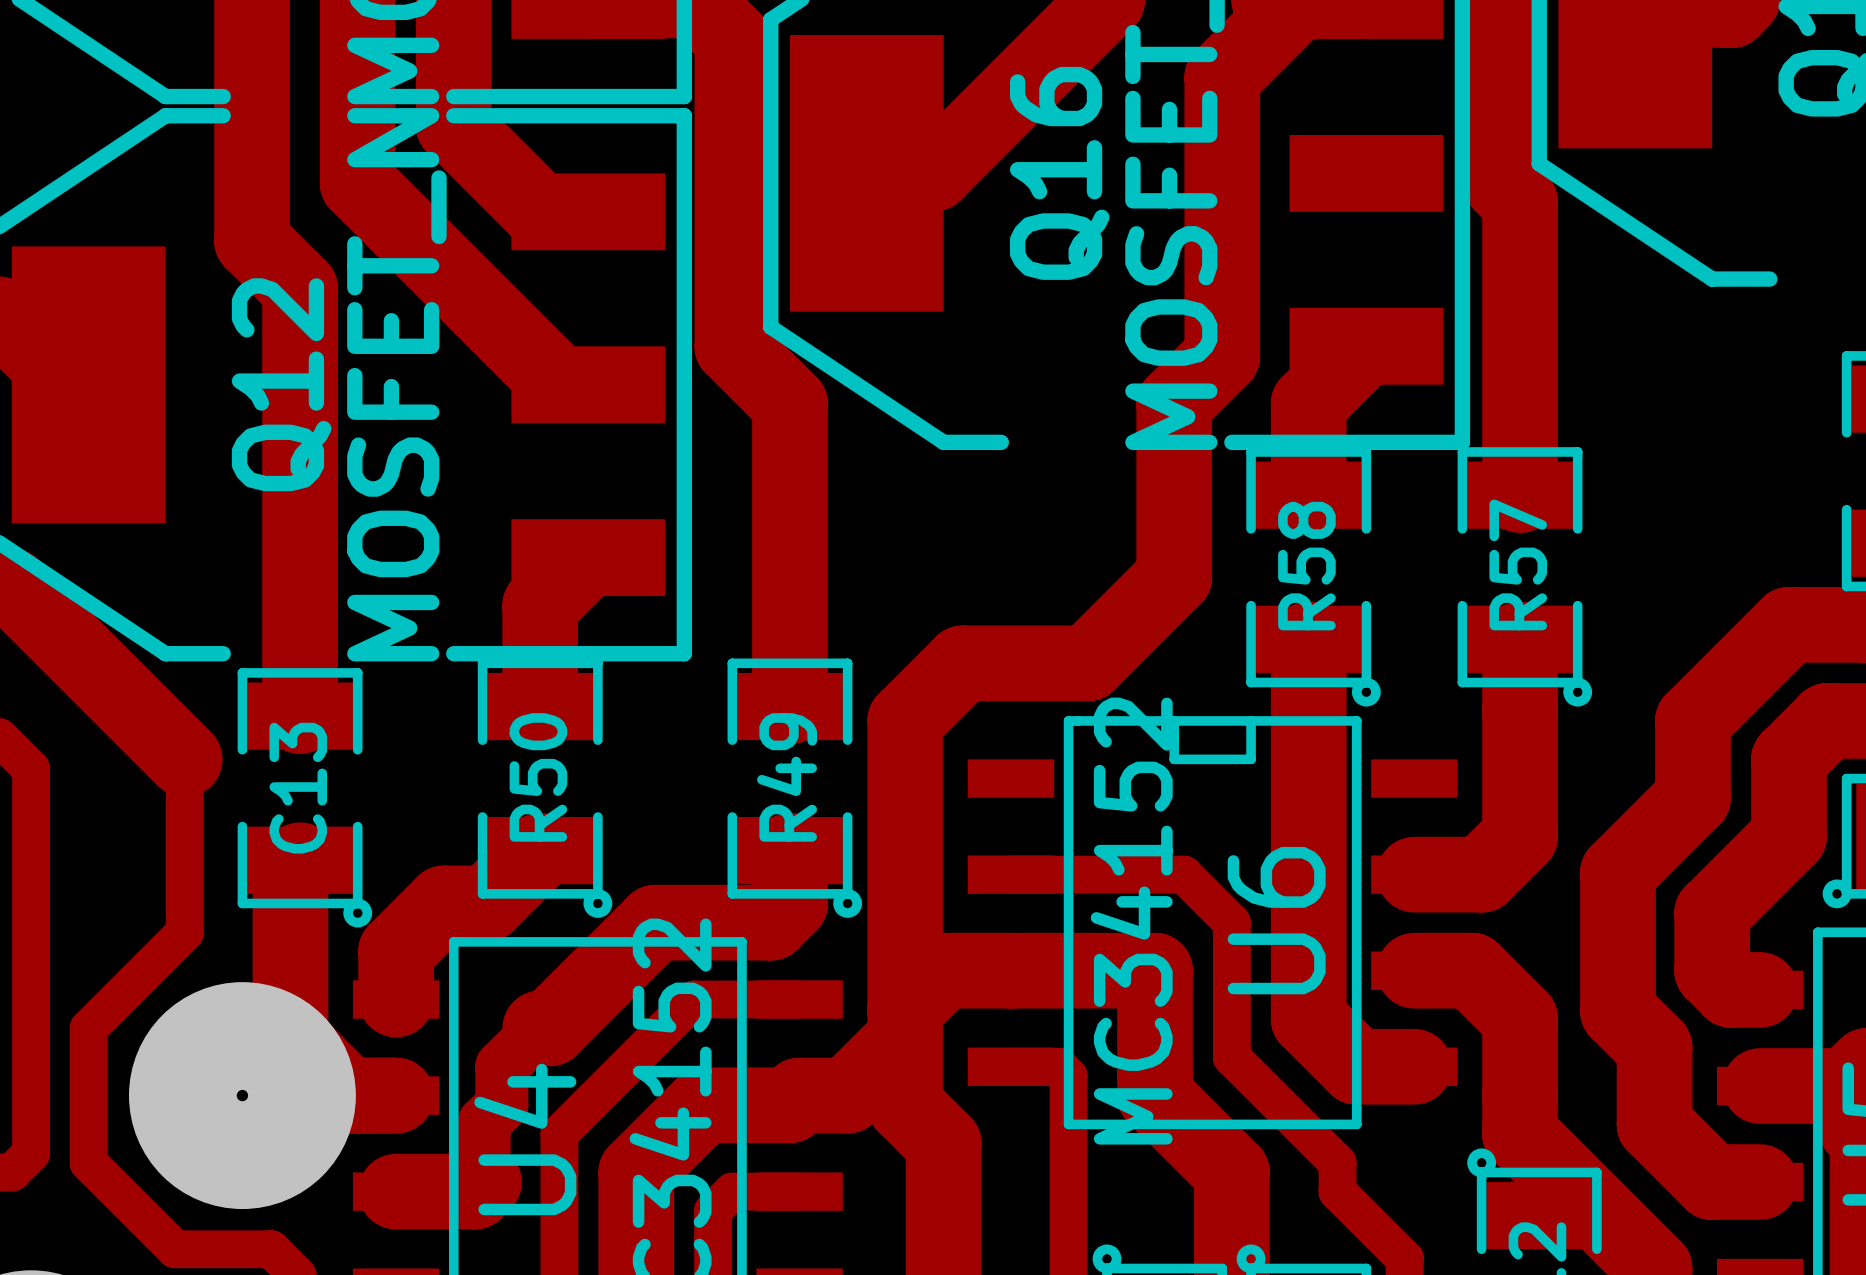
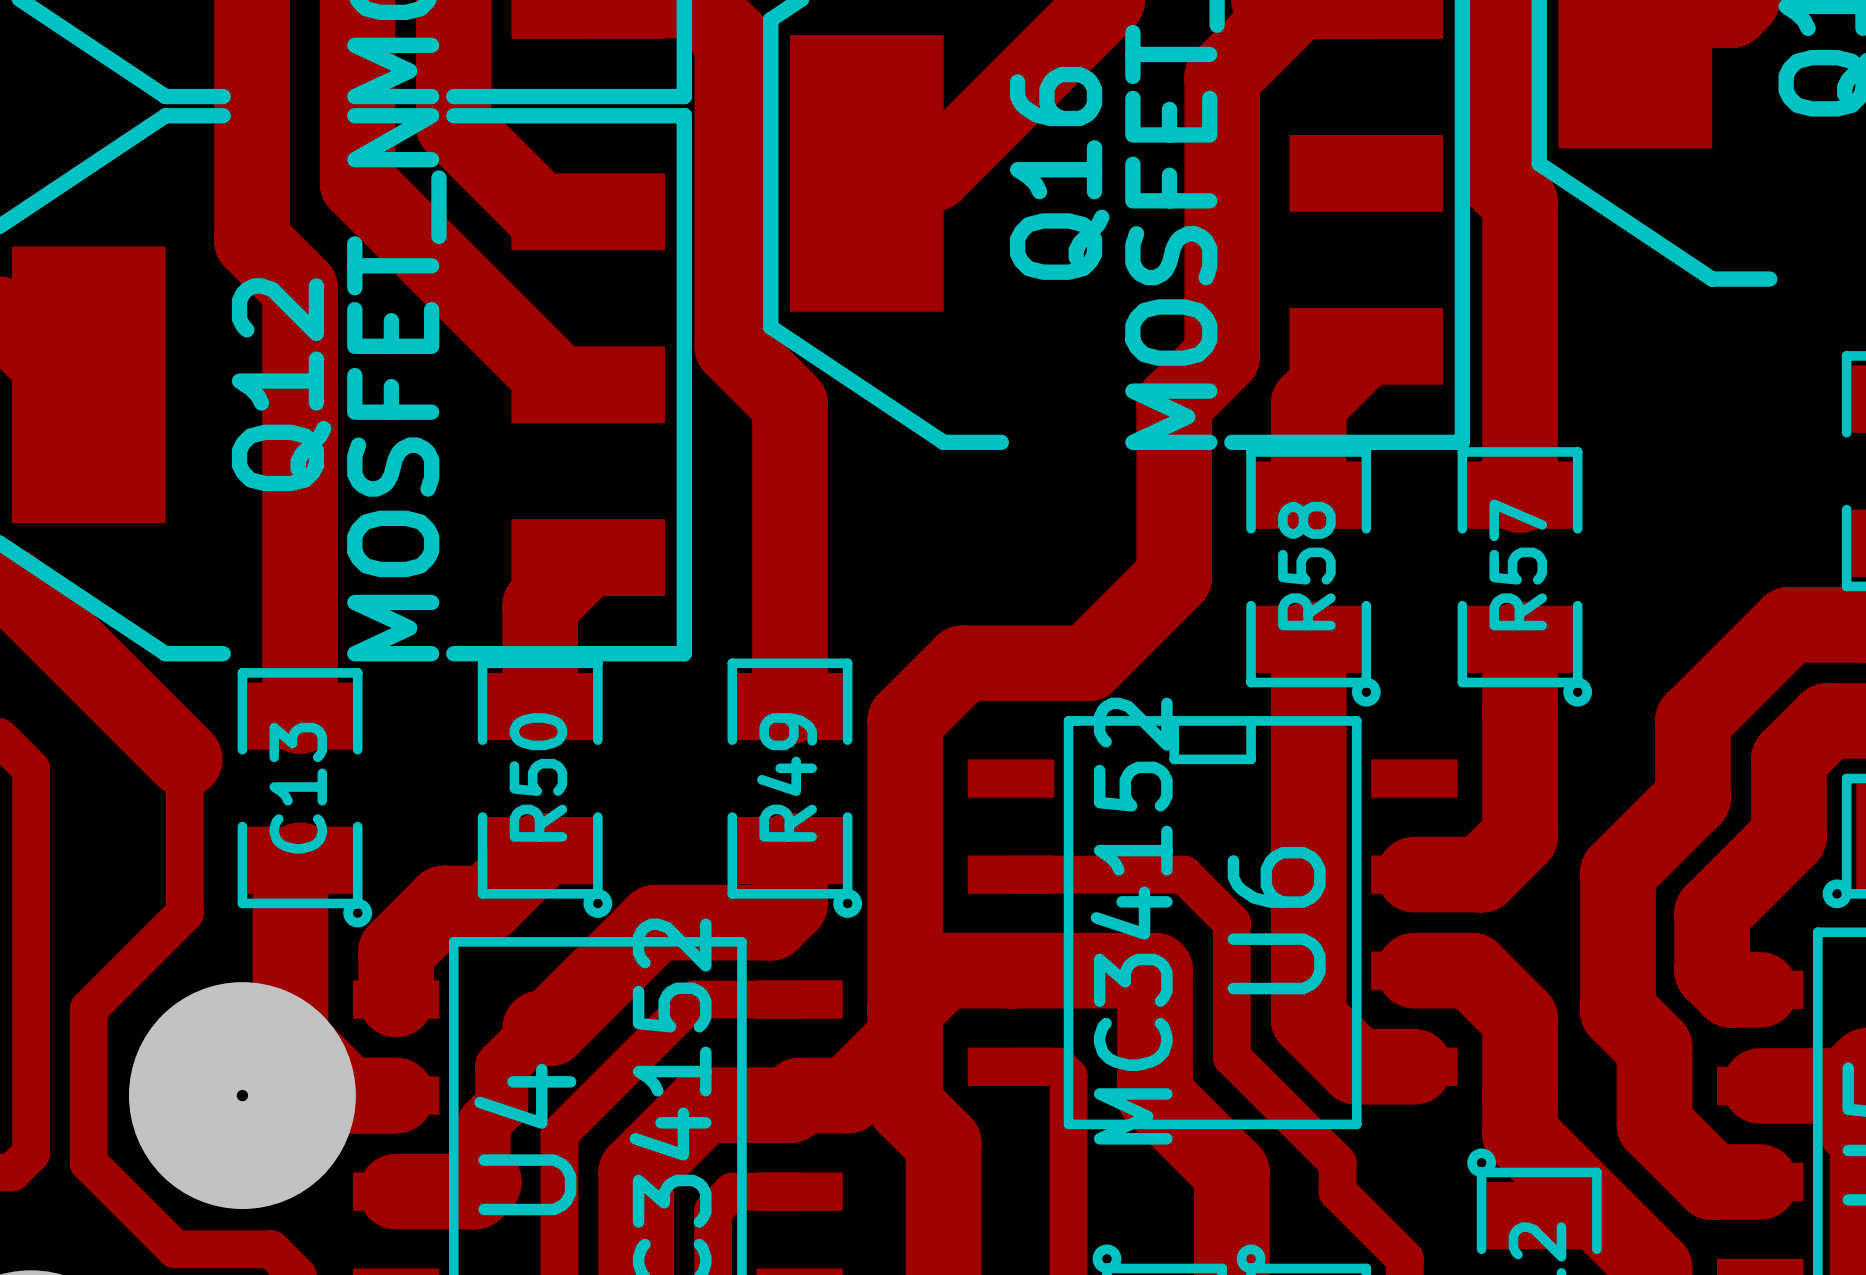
track: (184, 913) (184, 932) (88, 1028) -> (184, 913) (88, 1009) (88, 1028)

